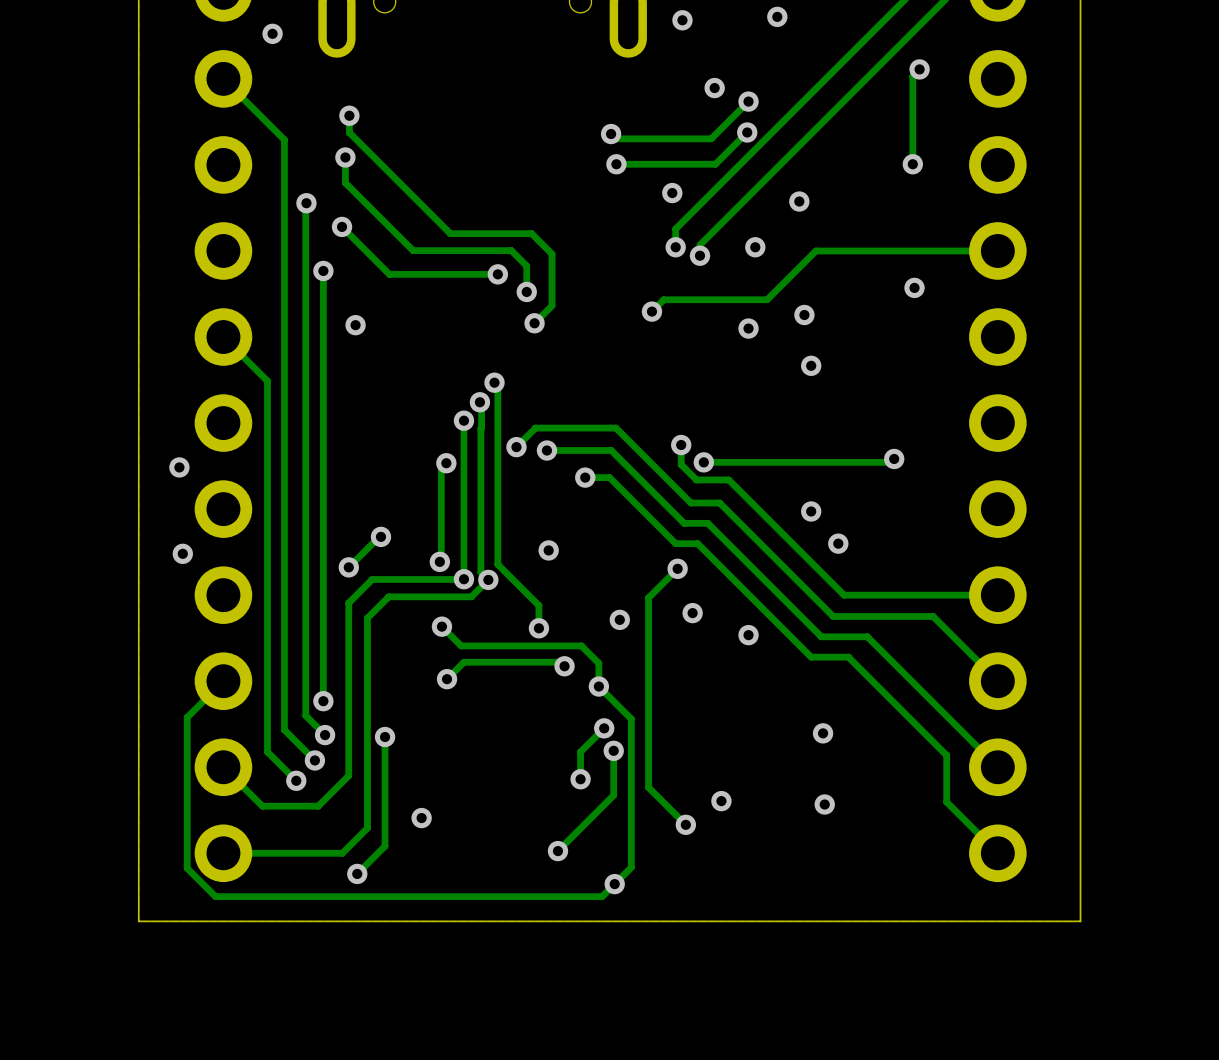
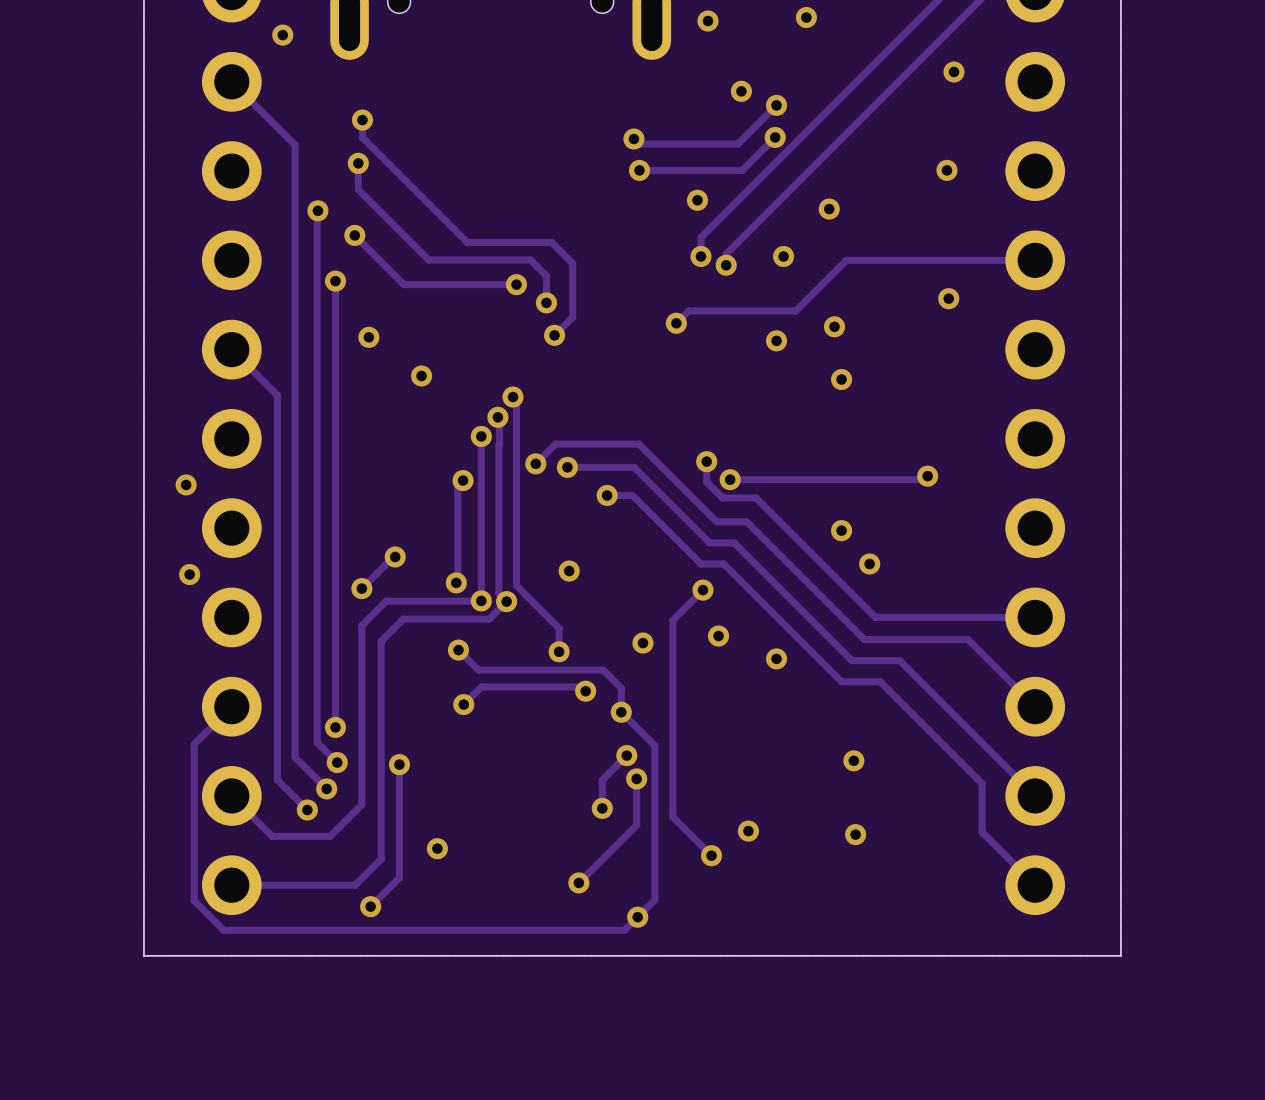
track: (919, 69) (912, 76) (912, 164) -> none
via: none -> (421, 375)

